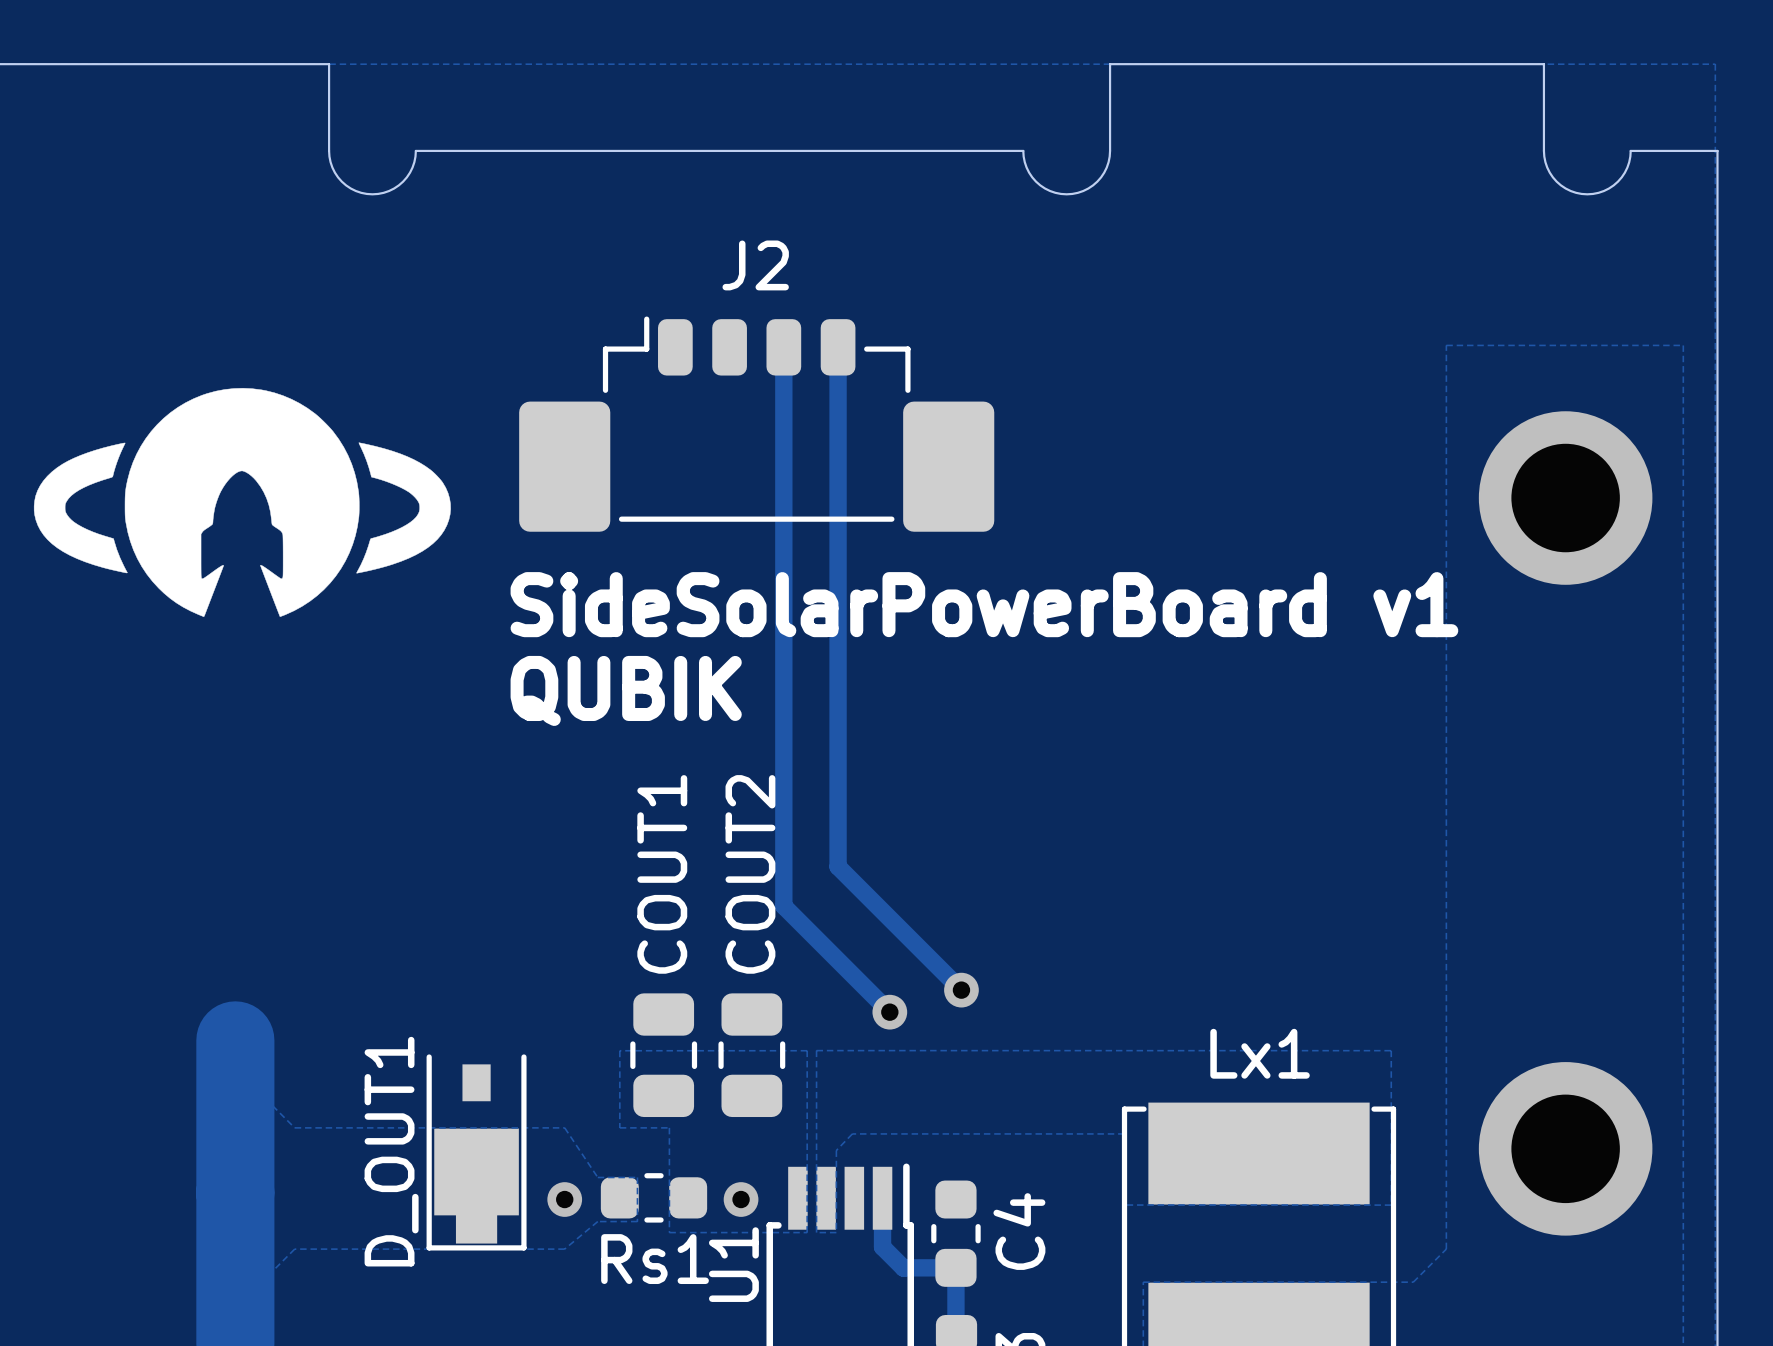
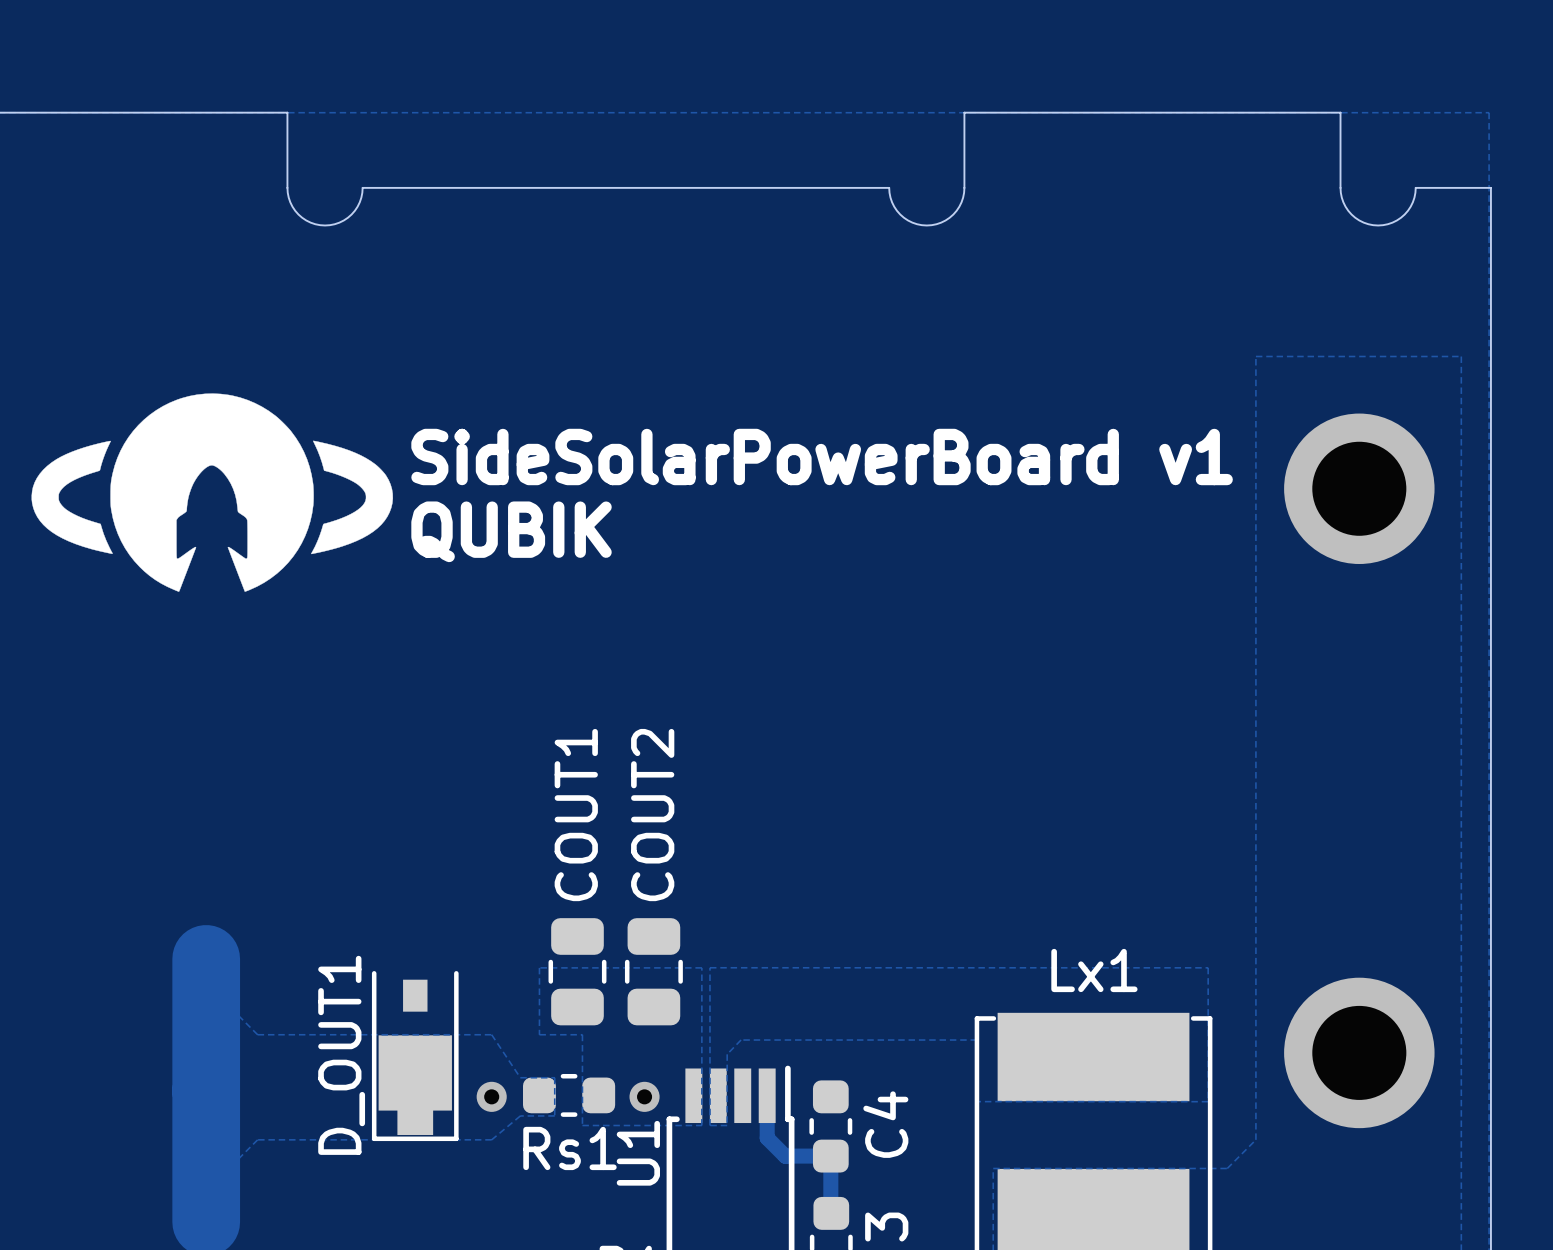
track: (783, 347) (783, 906) (889, 1012) -> none
track: (838, 347) (838, 866) (961, 990) -> none
J2: (756, 424) -> none
text position: SideSolarPowerBoard v1 (984, 604) -> SideSolarPowerBoard v1 (822, 457)
text position: QUBIK (626, 690) -> QUBIK (511, 531)
via: (961, 990) -> none
via: (889, 1012) -> none

